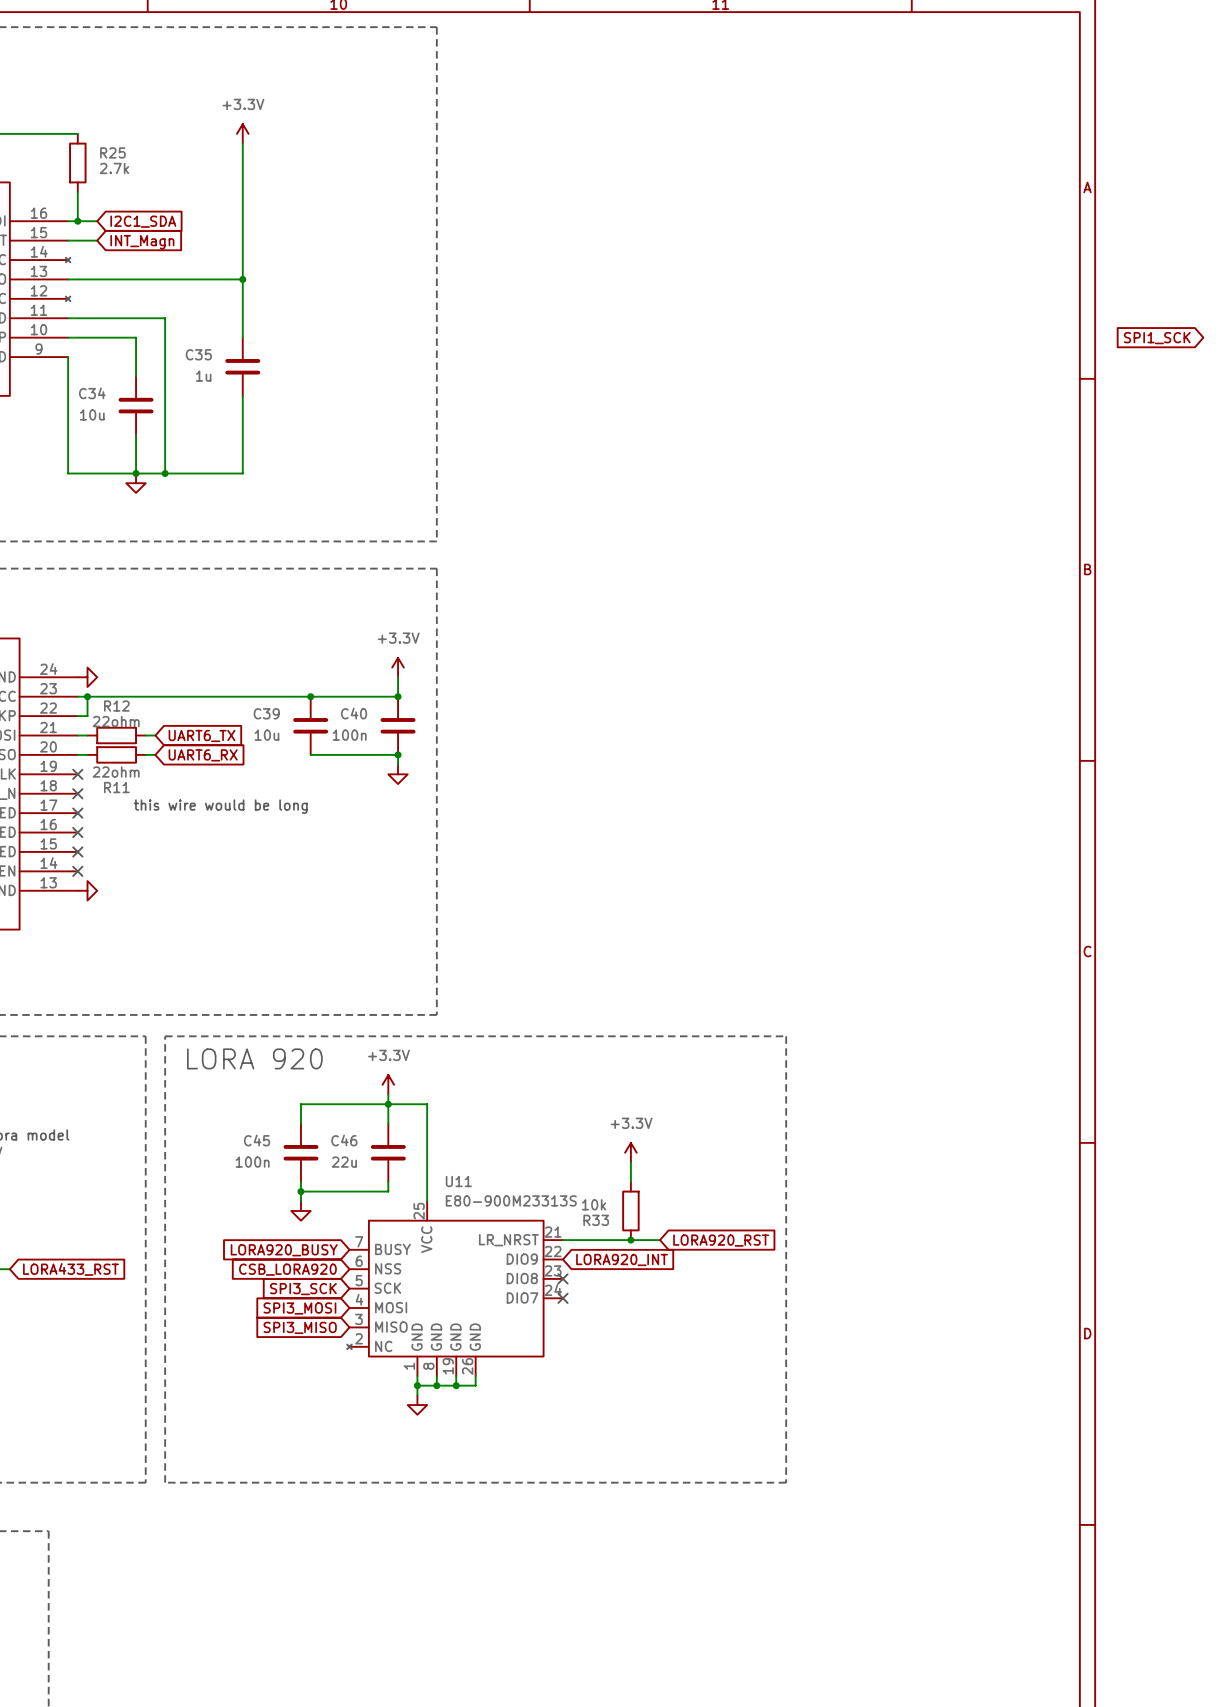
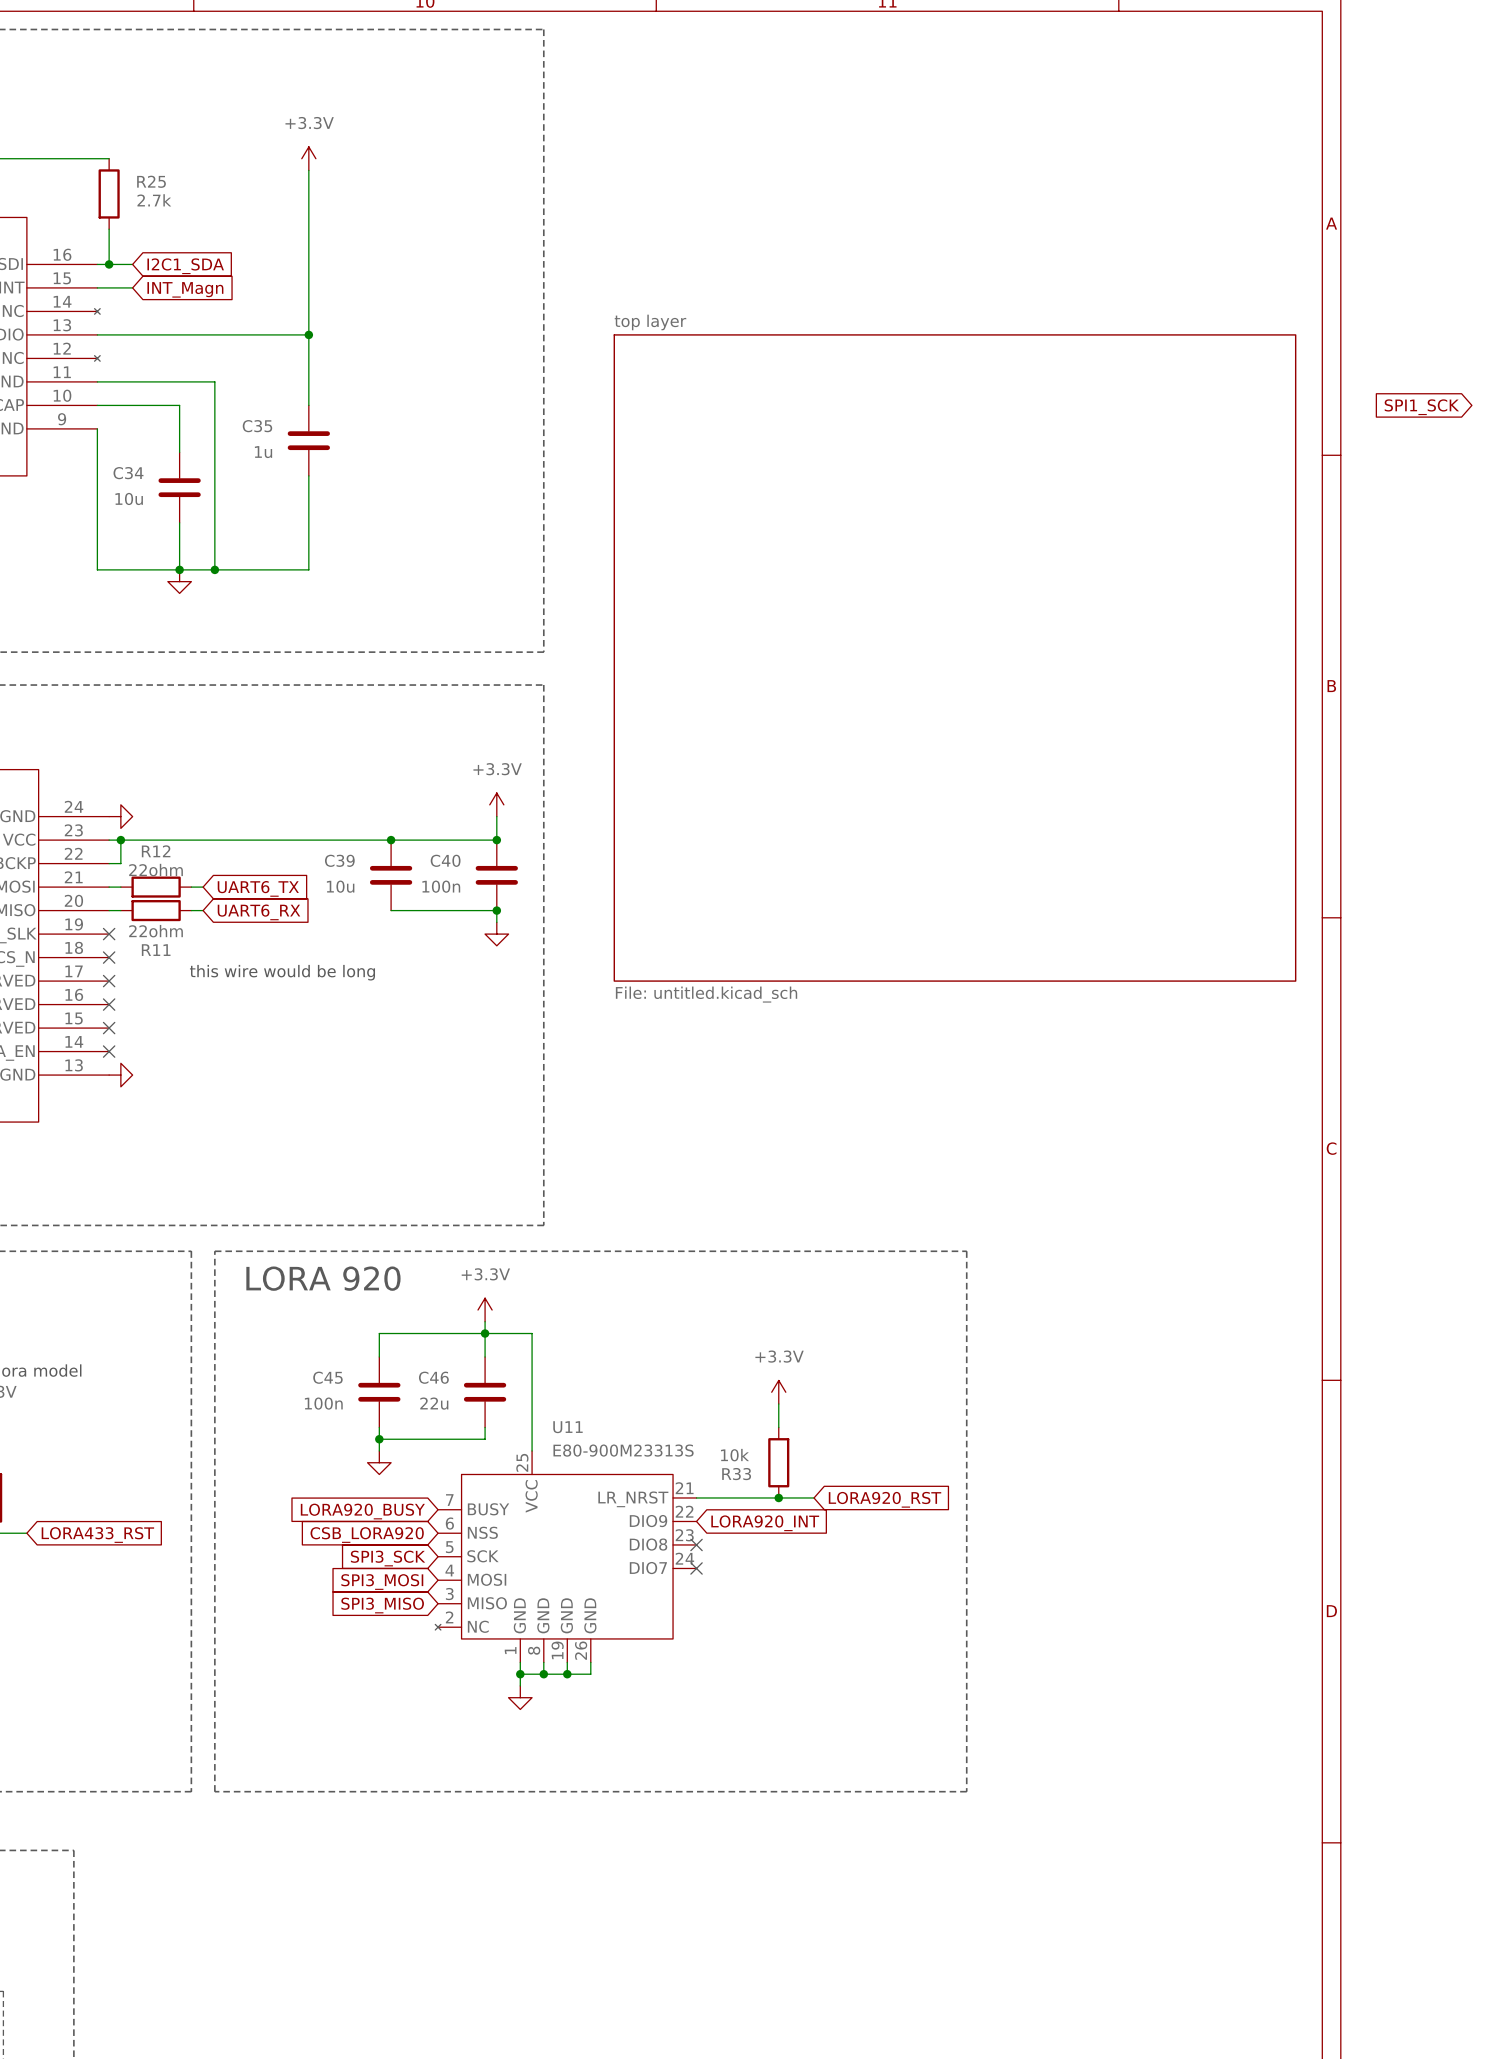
sheet top layer: none -> File: untitled.kicad_sch (954, 658)

